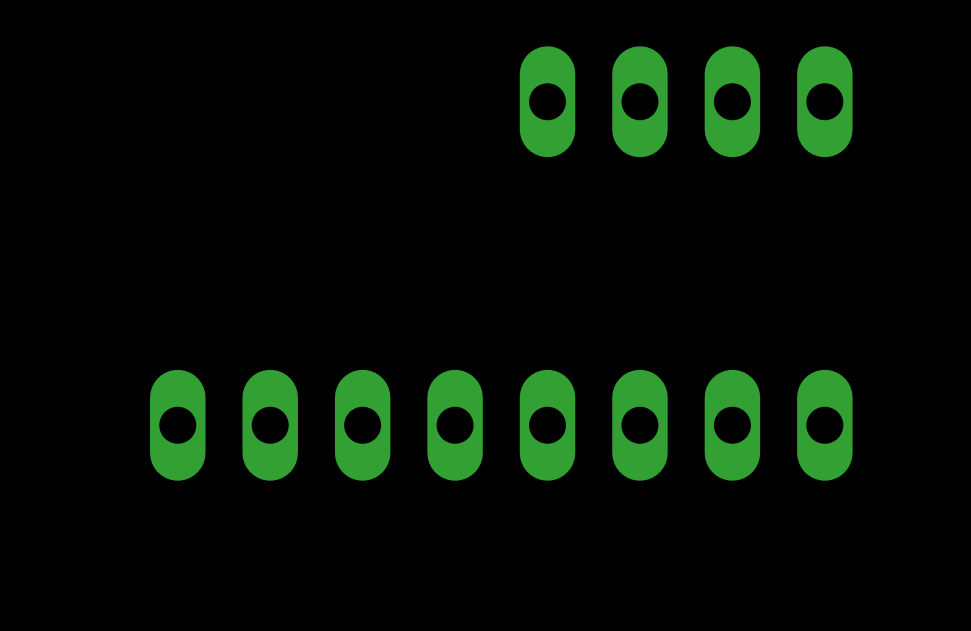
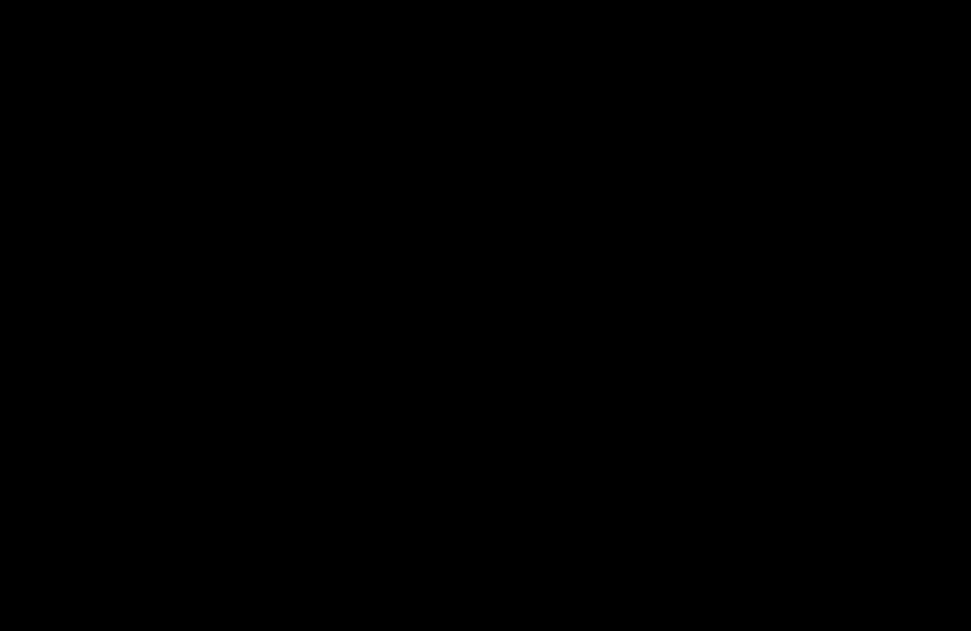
part: (686, 101) -> none
part: (501, 425) -> none

